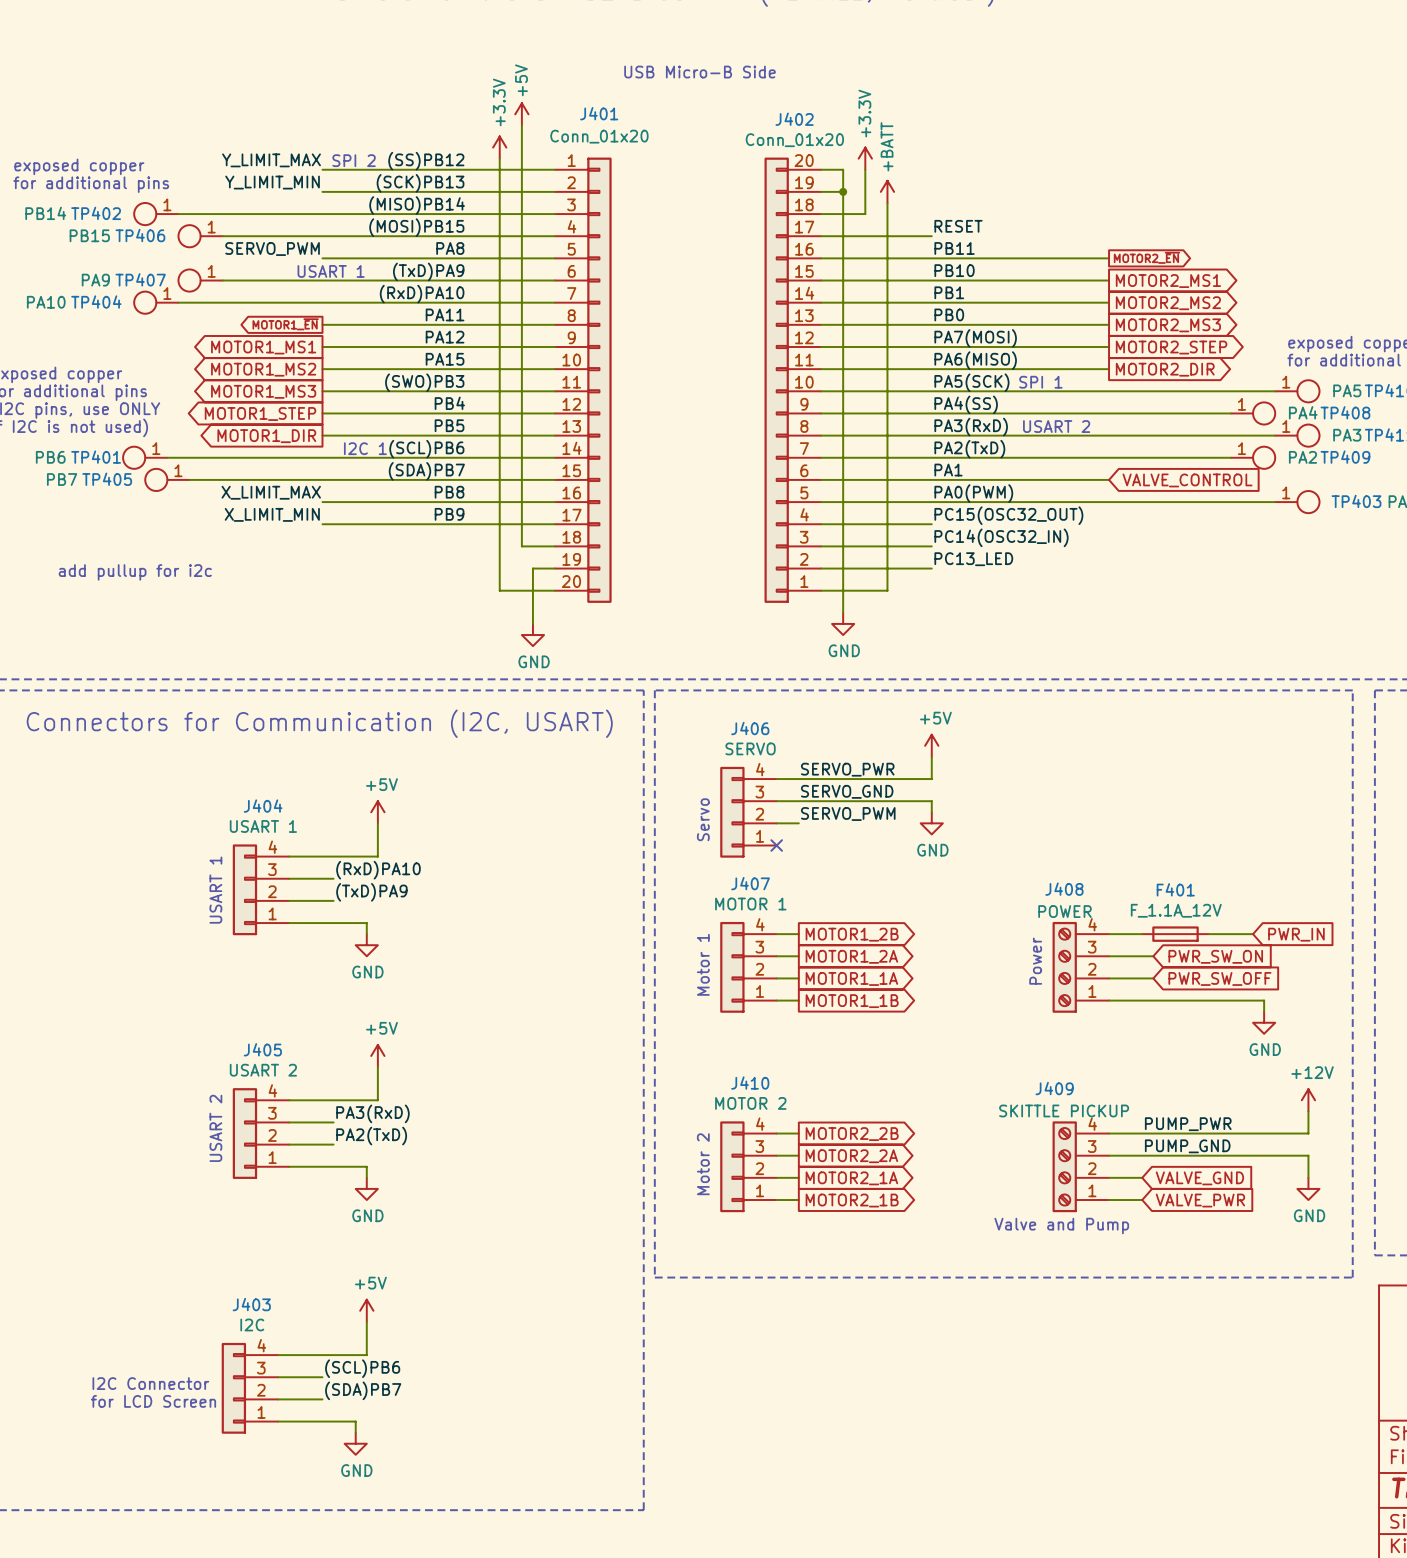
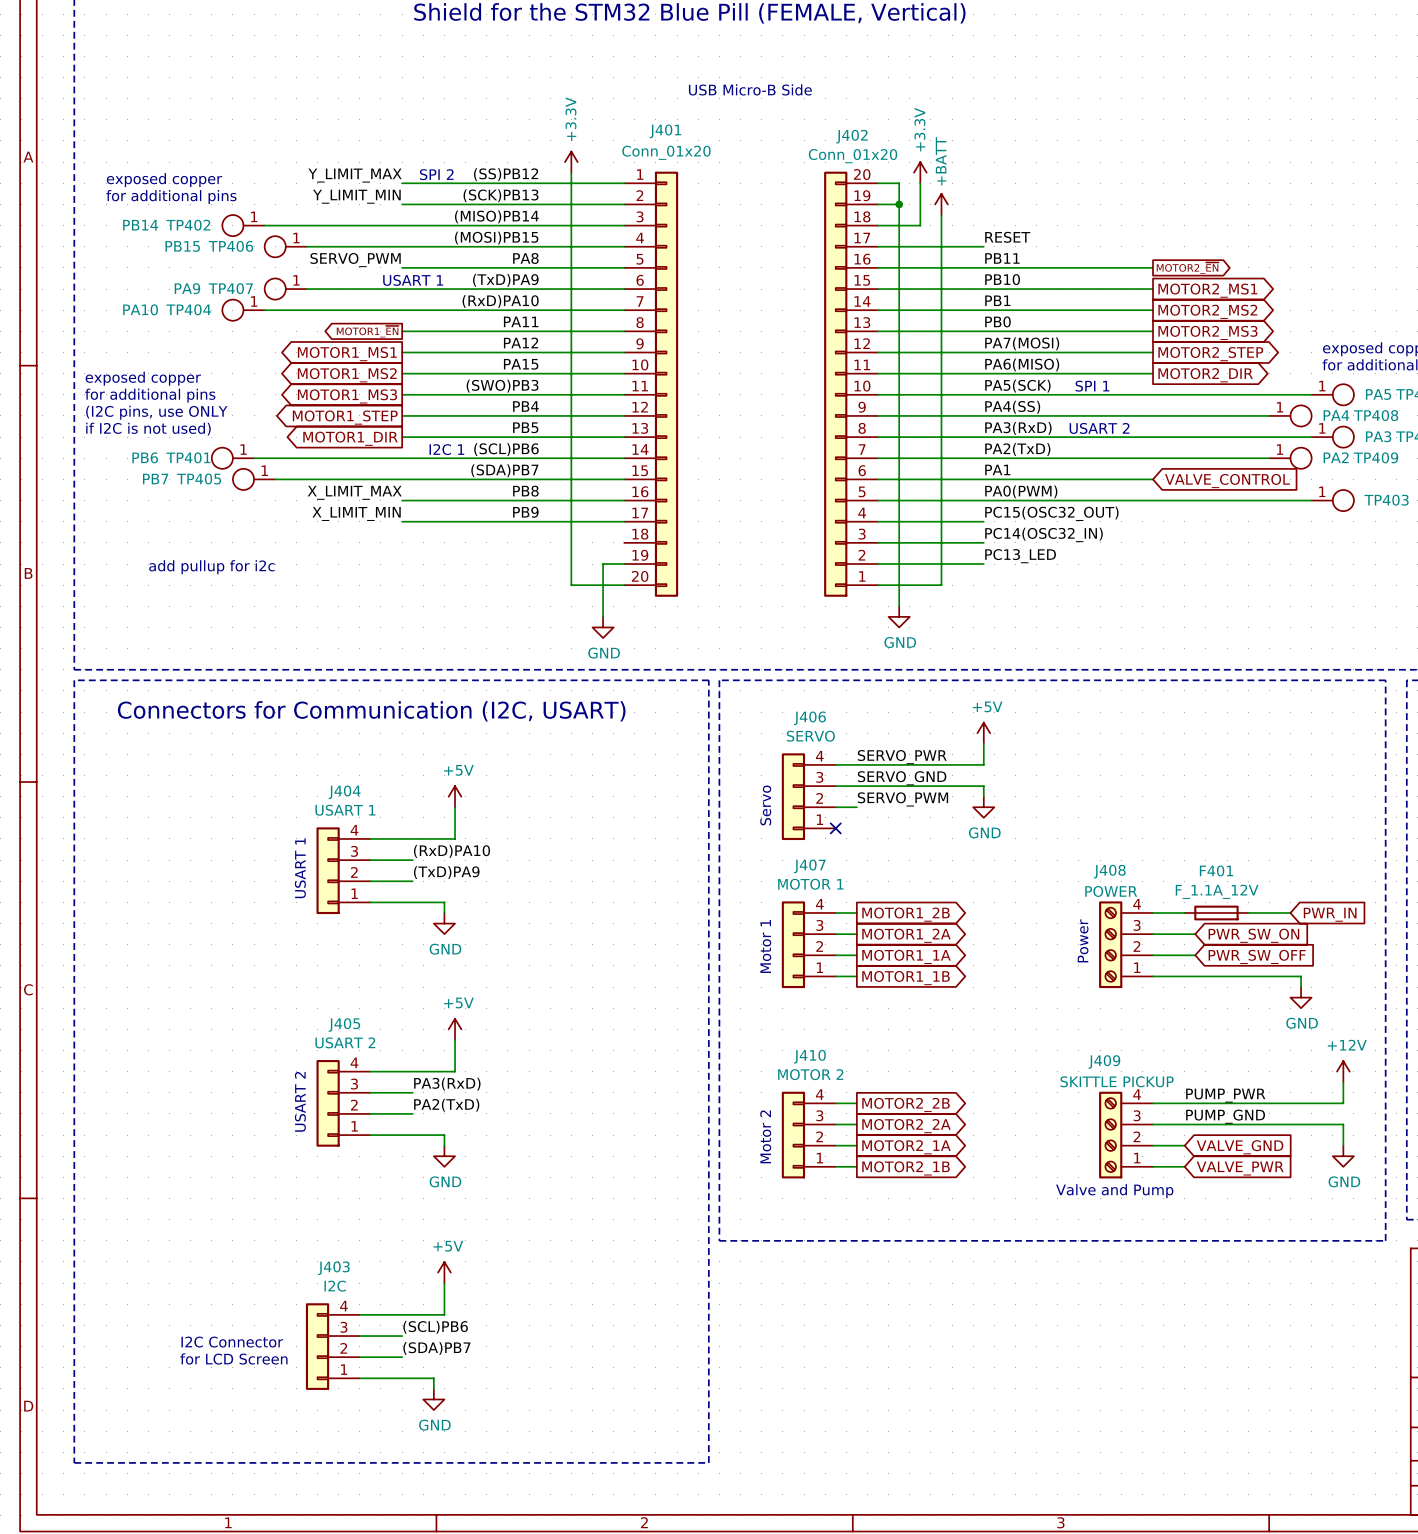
power symbol: +5V (521, 114) -> none
wire: (521, 125) (521, 546) (555, 546) -> none

